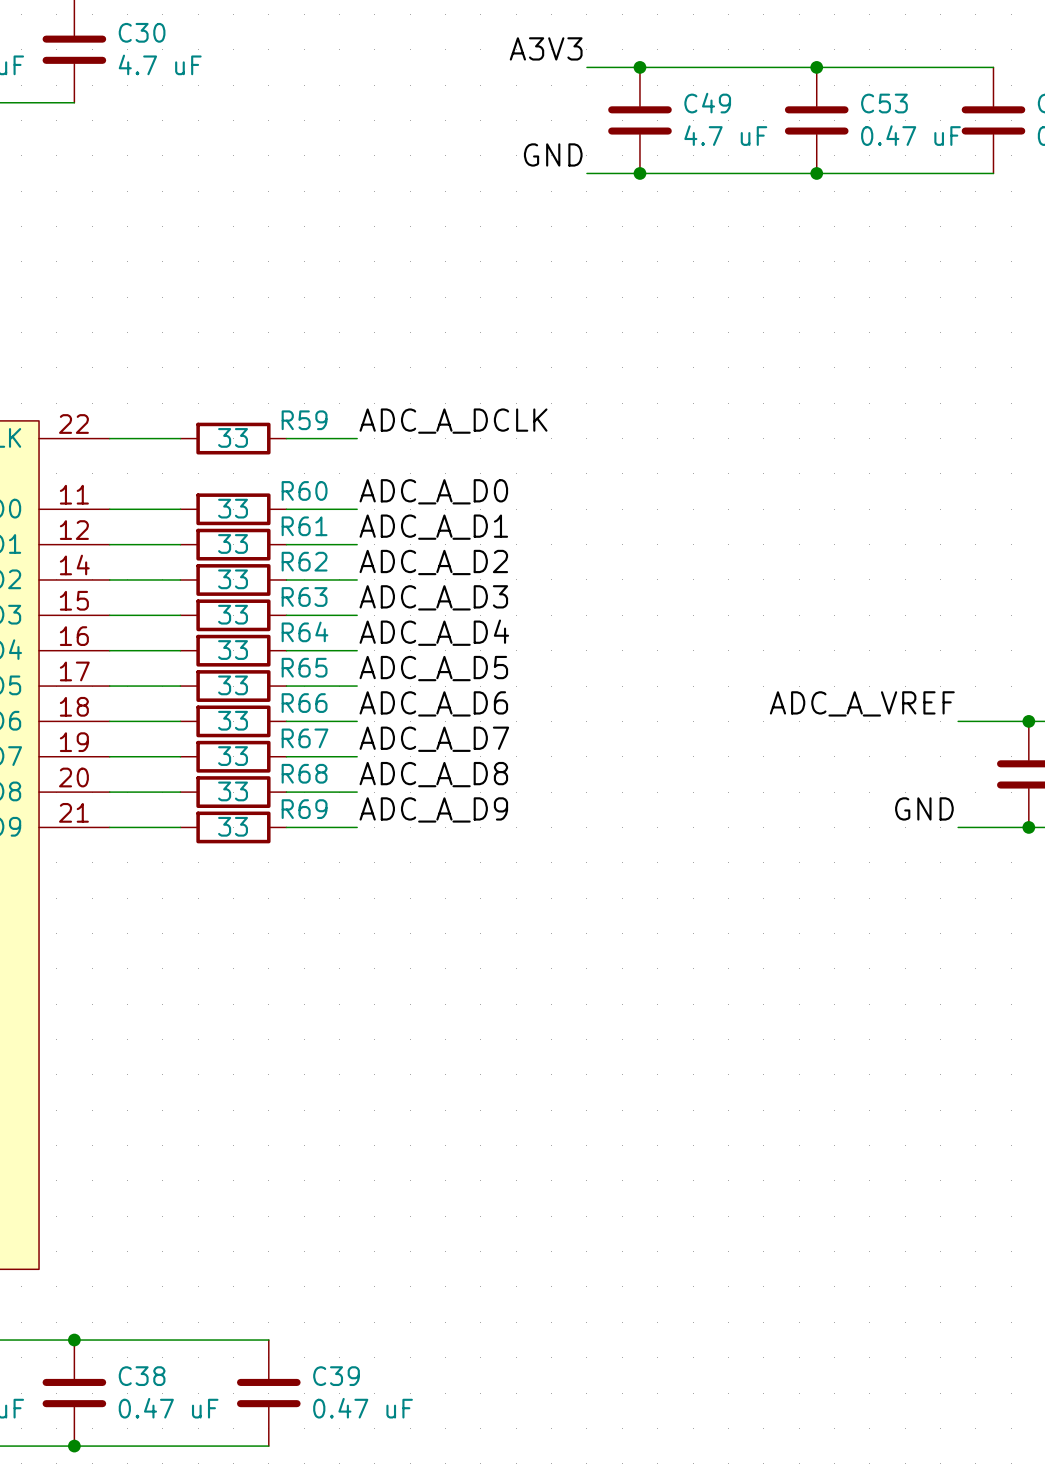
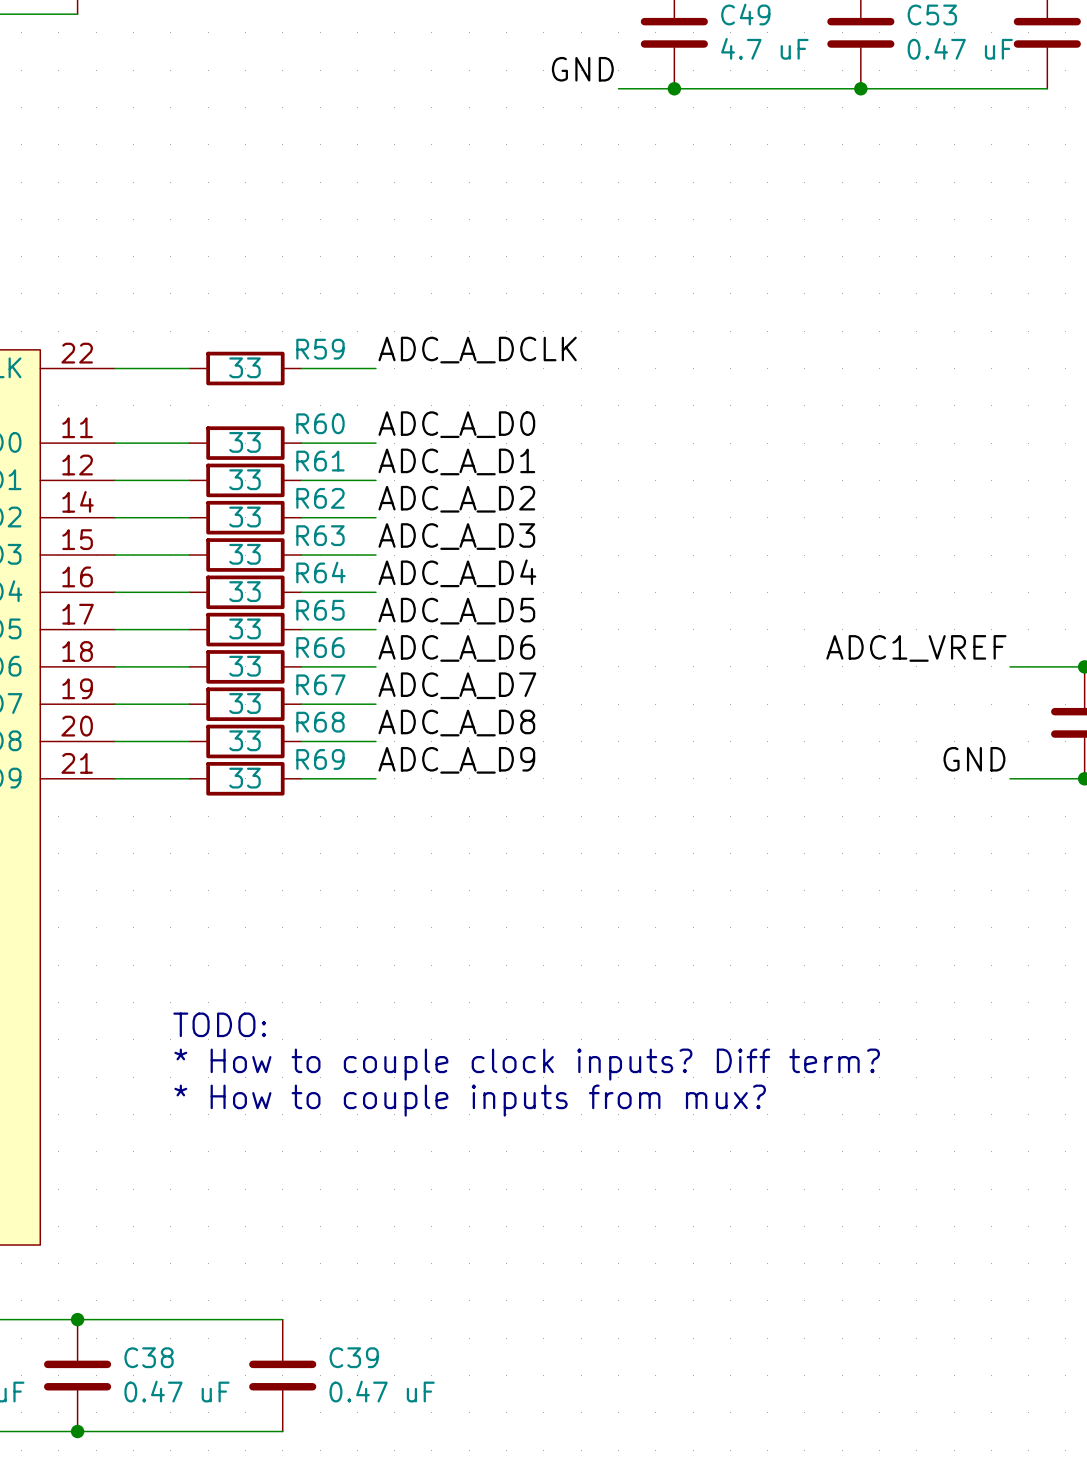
label: ADC_A_VREF (862, 703) -> ADC1_VREF (916, 648)
text: none -> TODO: (219, 1024)
text: none -> * How to couple clock inputs? Diff term? (527, 1064)
text: none -> * How to couple inputs from mux? (470, 1100)

